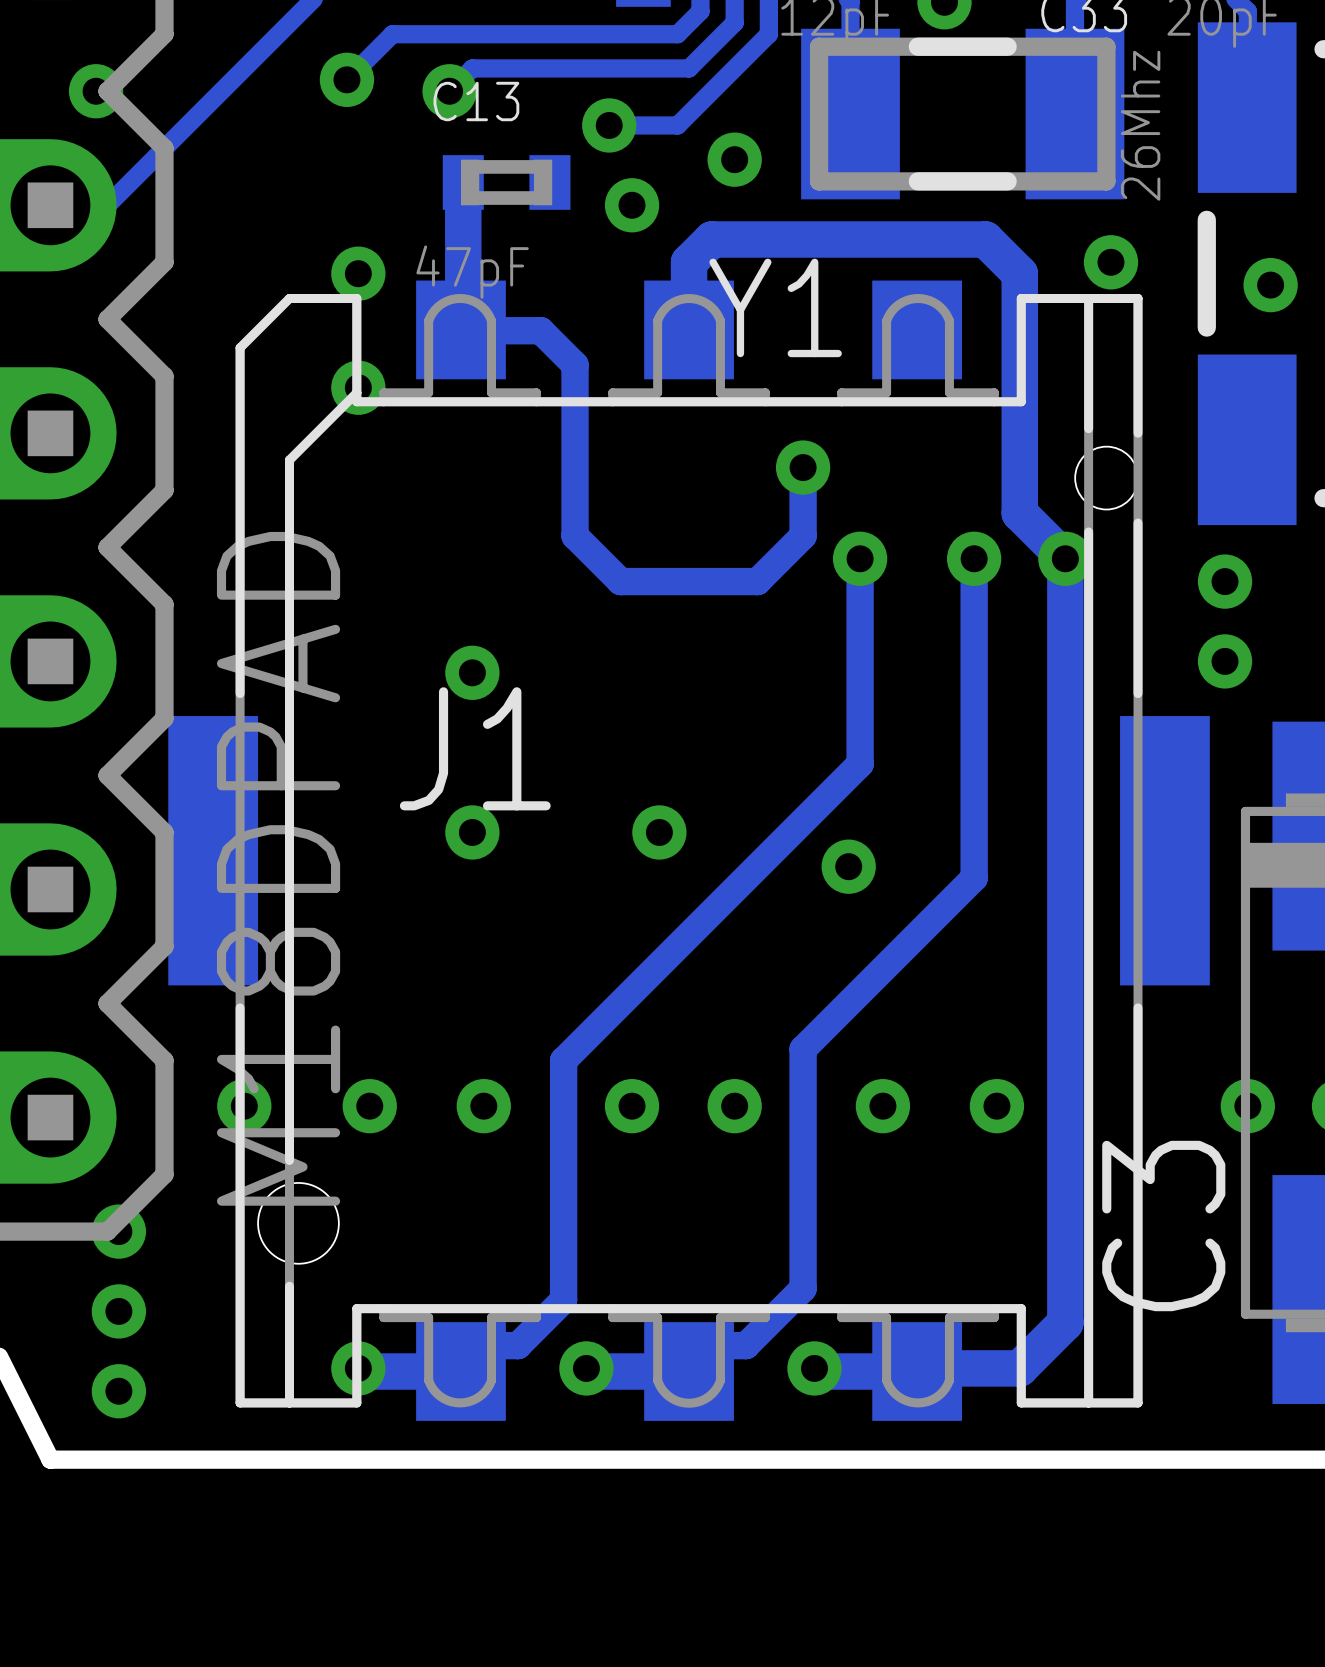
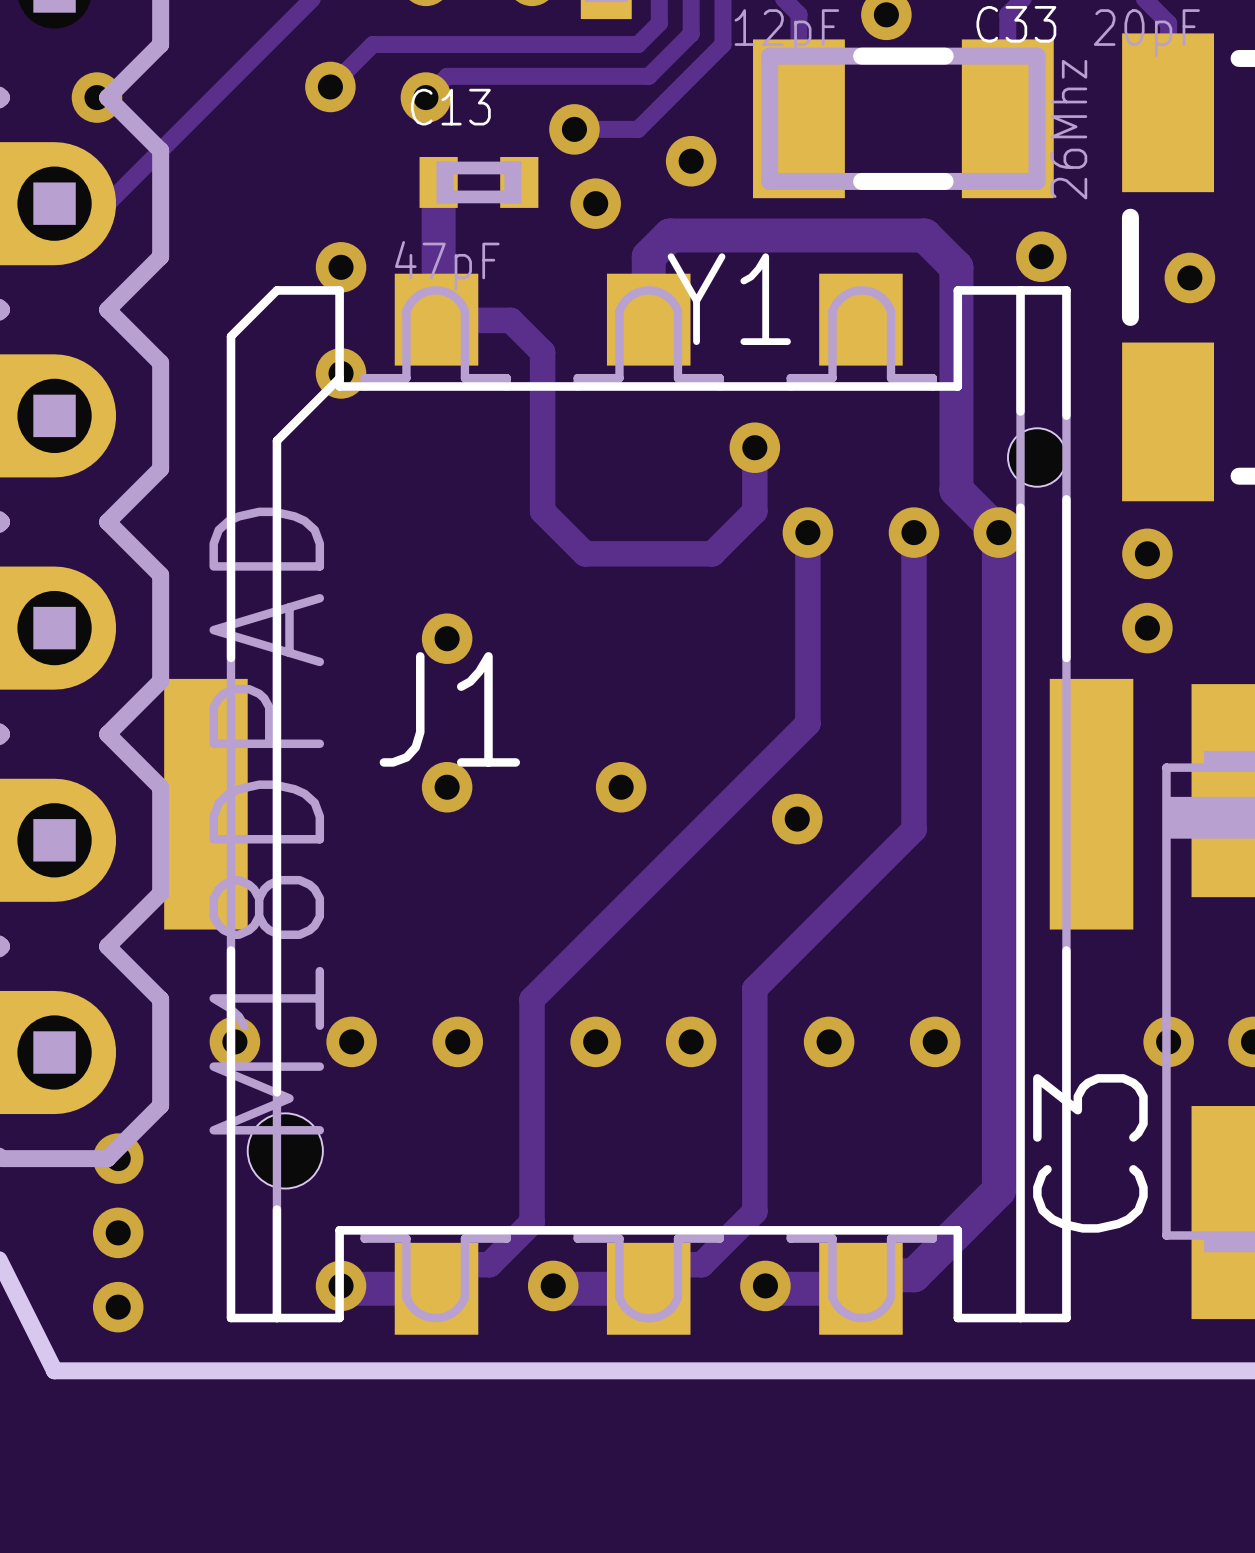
track: (1065, 1265) (1065, 1322) (1019, 1368) (920, 1368) -> (998, 1190) (913, 1275) (874, 1275) (863, 1285)

